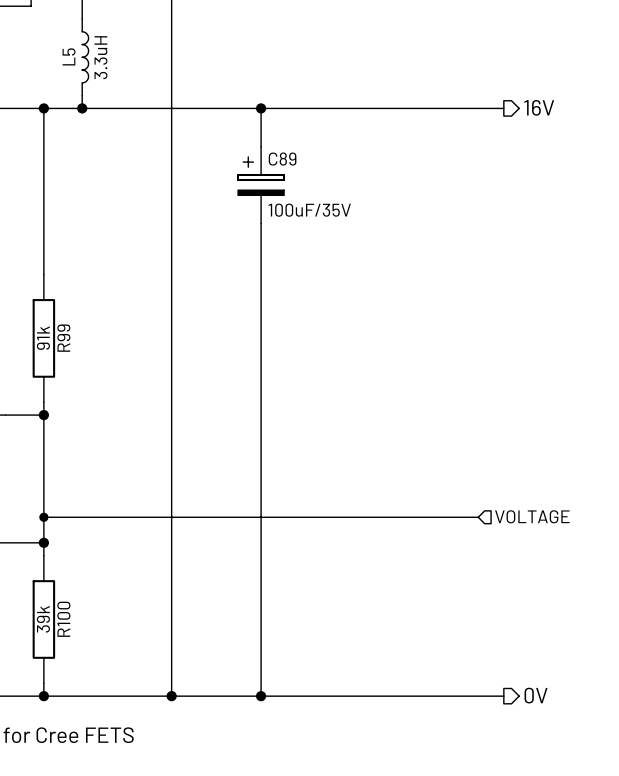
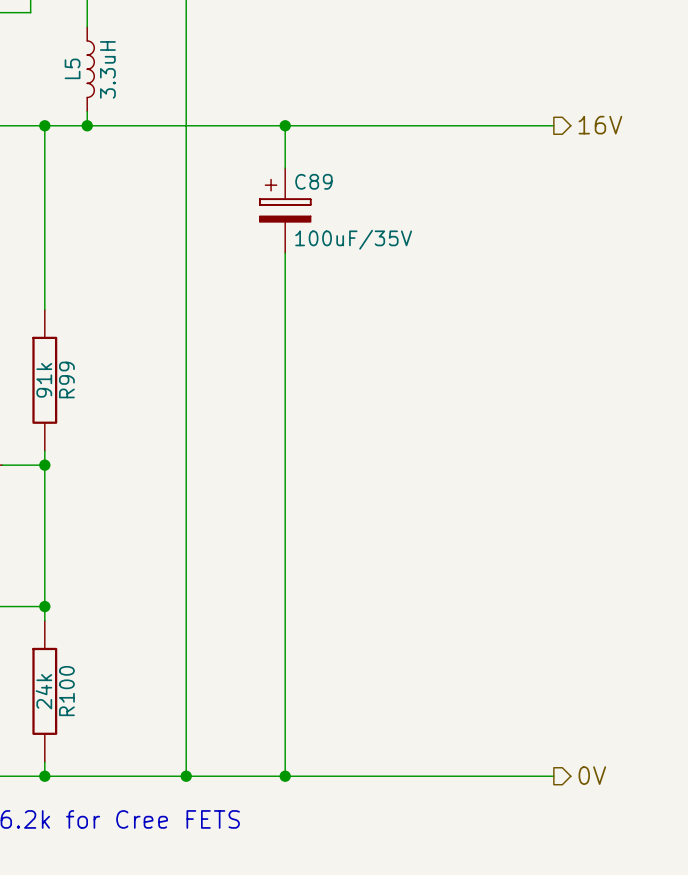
hierarchical label: VOLTAGE (532, 516) -> none
wire: (43, 517) (478, 517) -> none
junction: (43, 517) -> none
R100 value: 39k (43, 619) -> 24k (43, 691)

